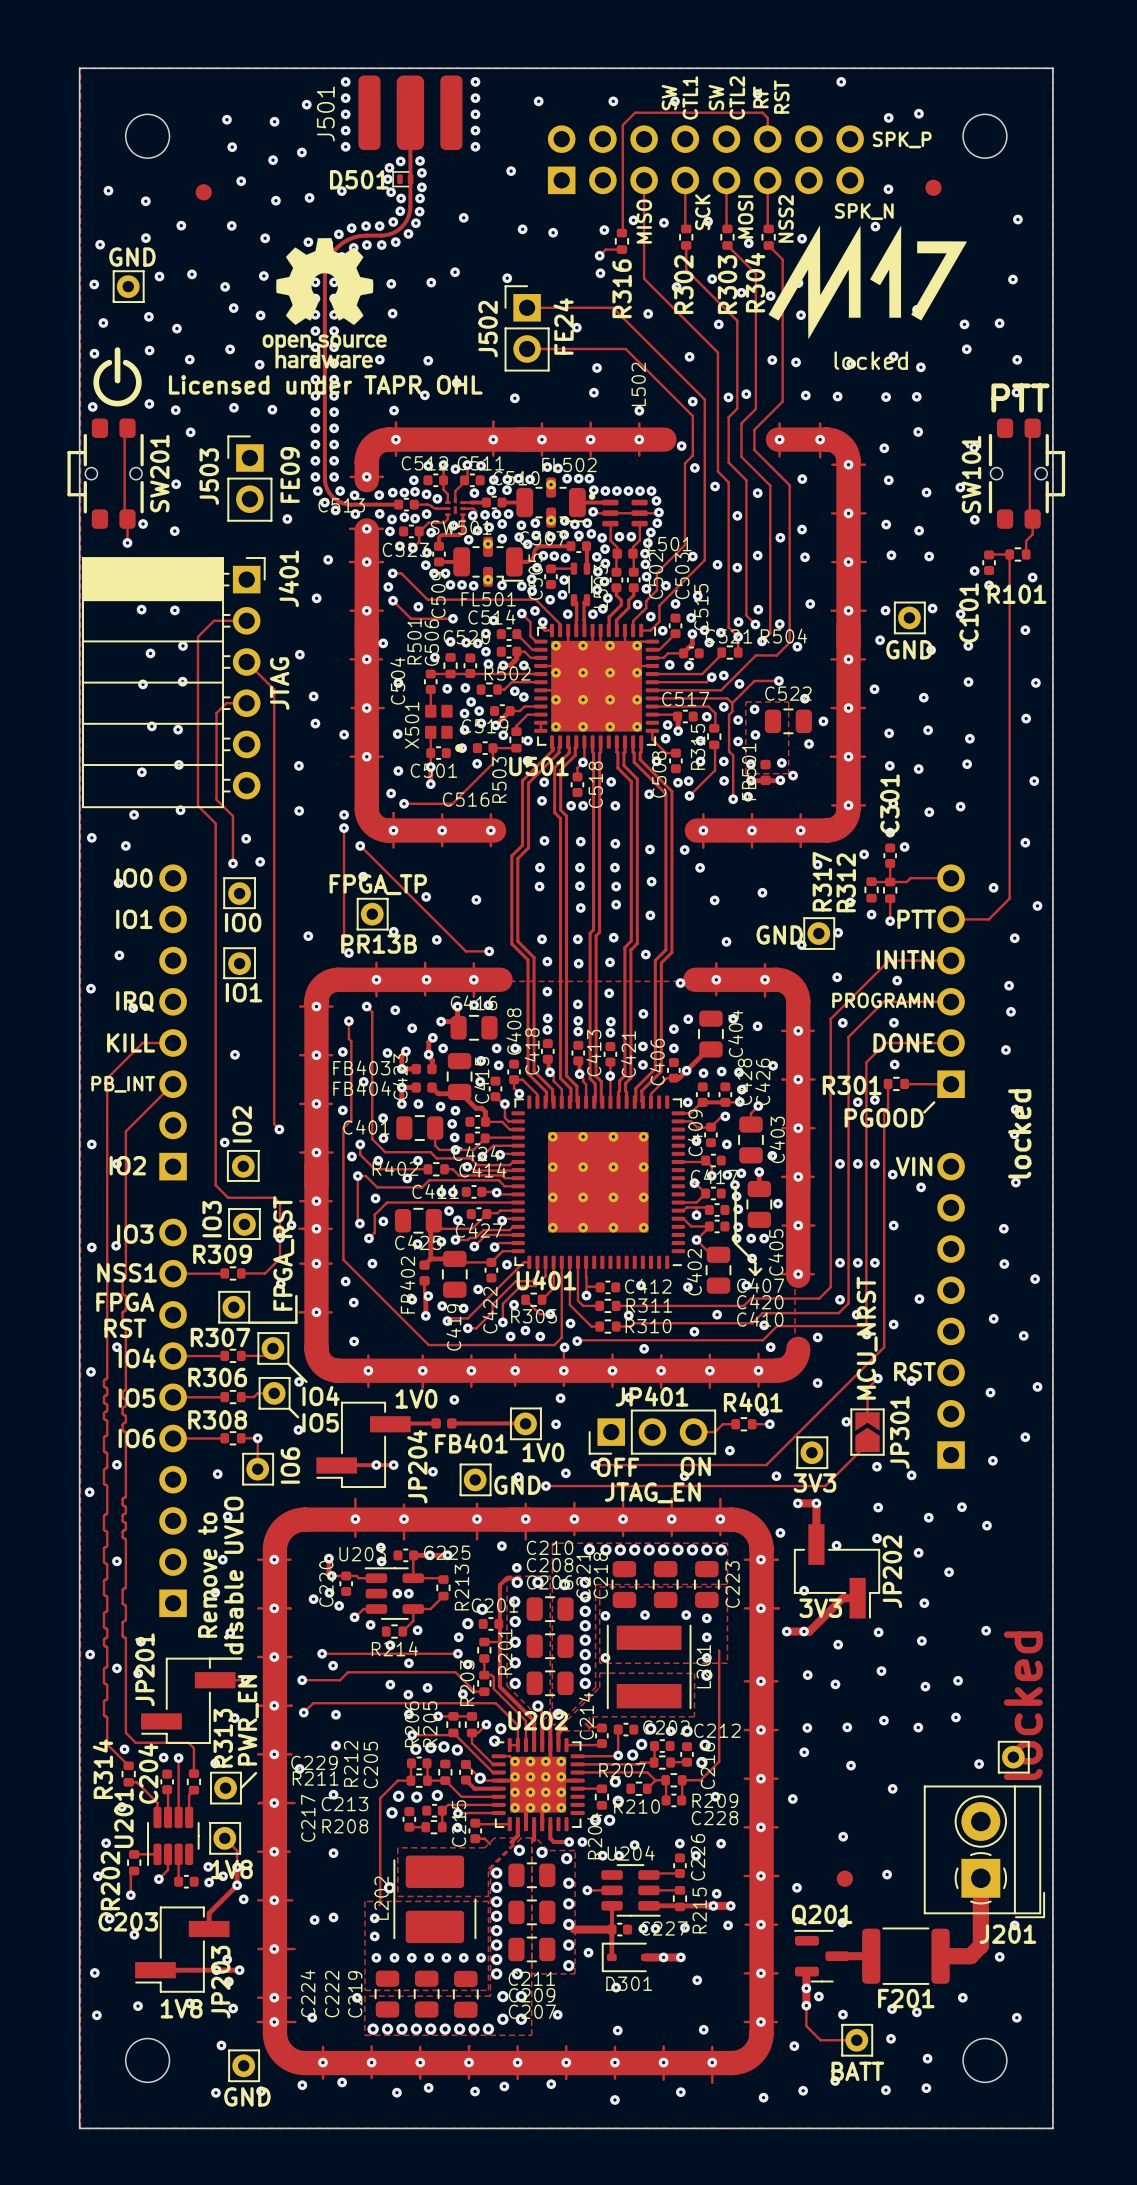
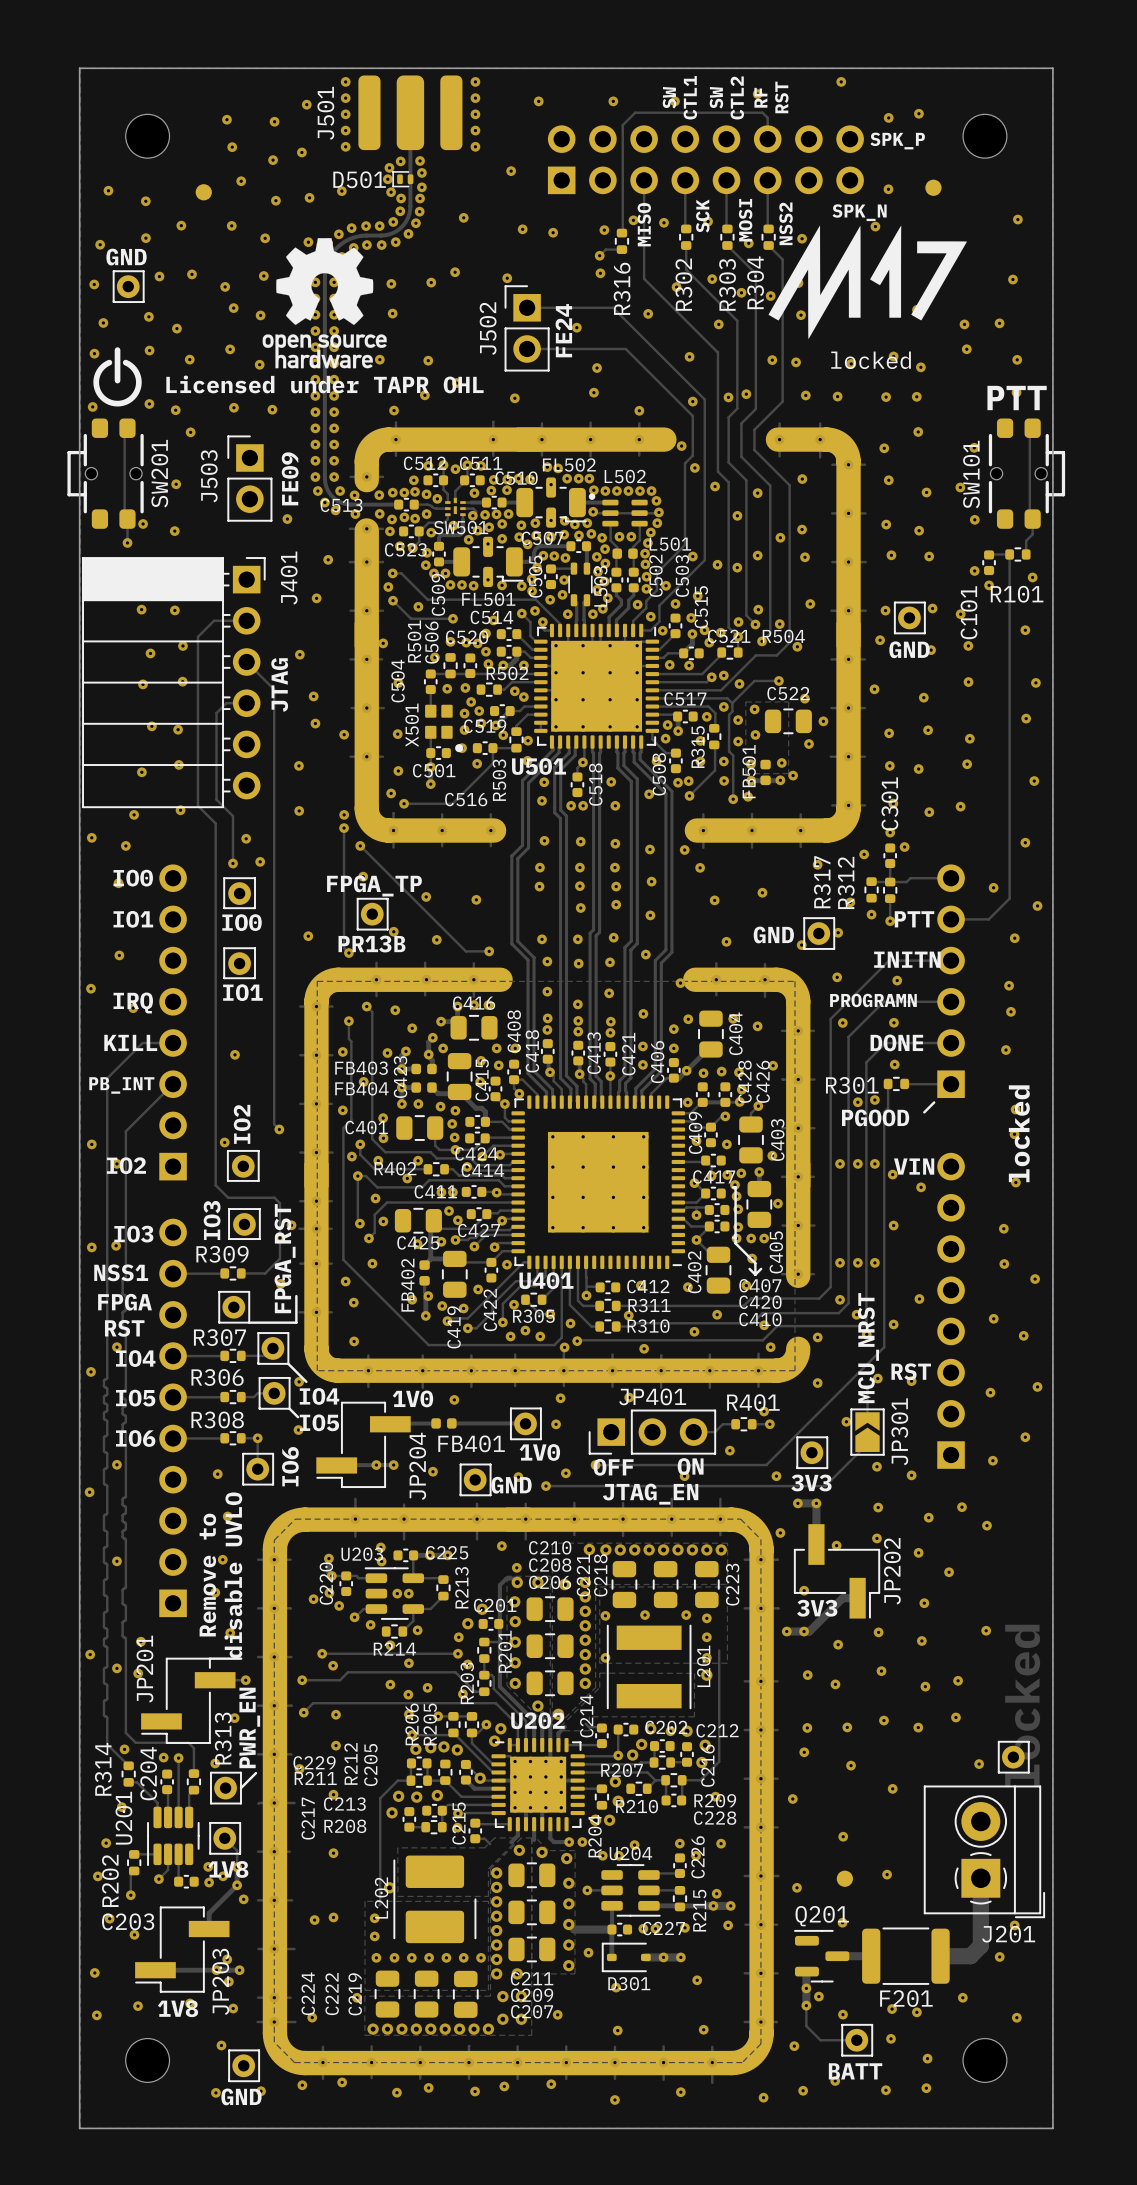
L502 name rotation: 0° (638, 384) -> 90° clockwise (625, 476)
L502 name position: L502 (638, 384) -> L502 (625, 476)

